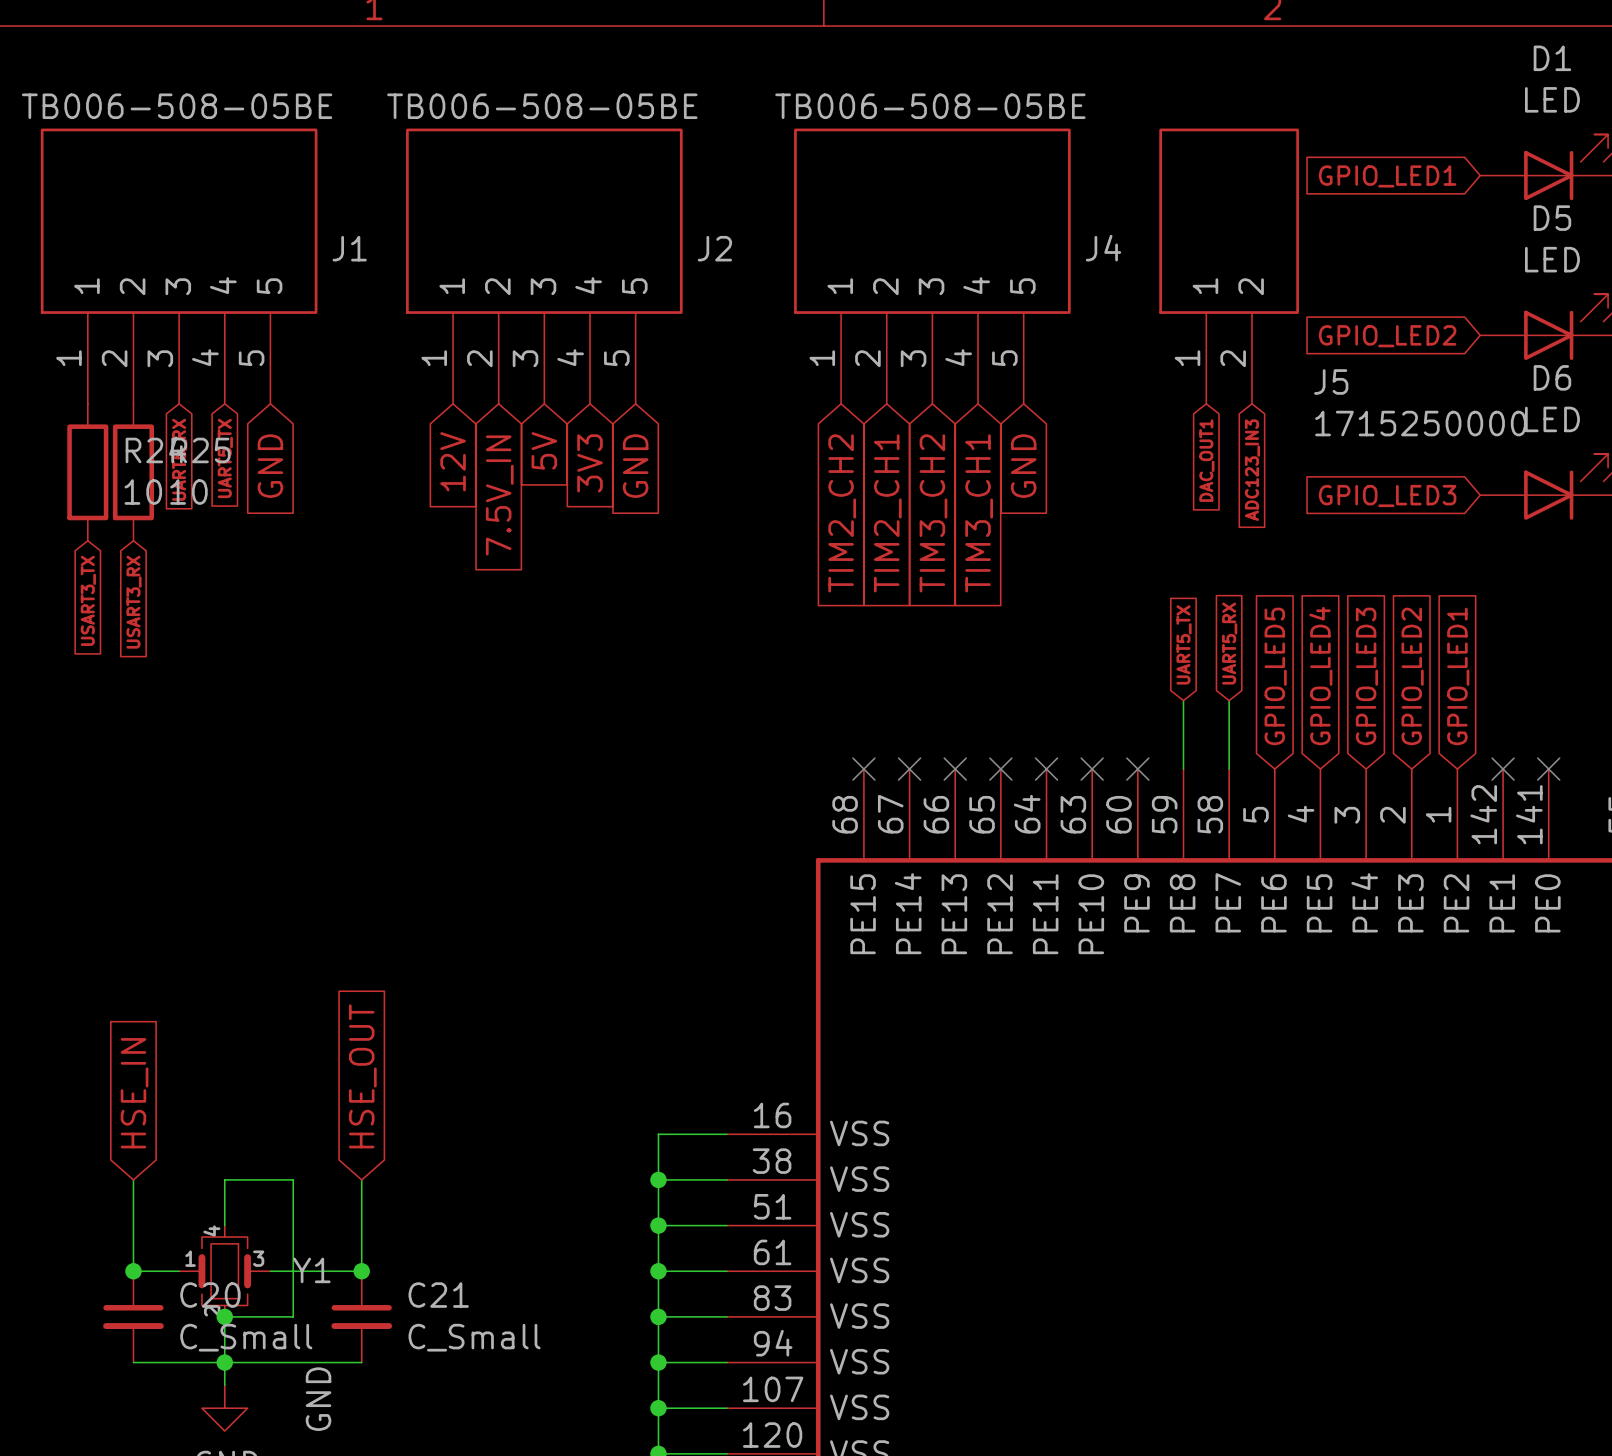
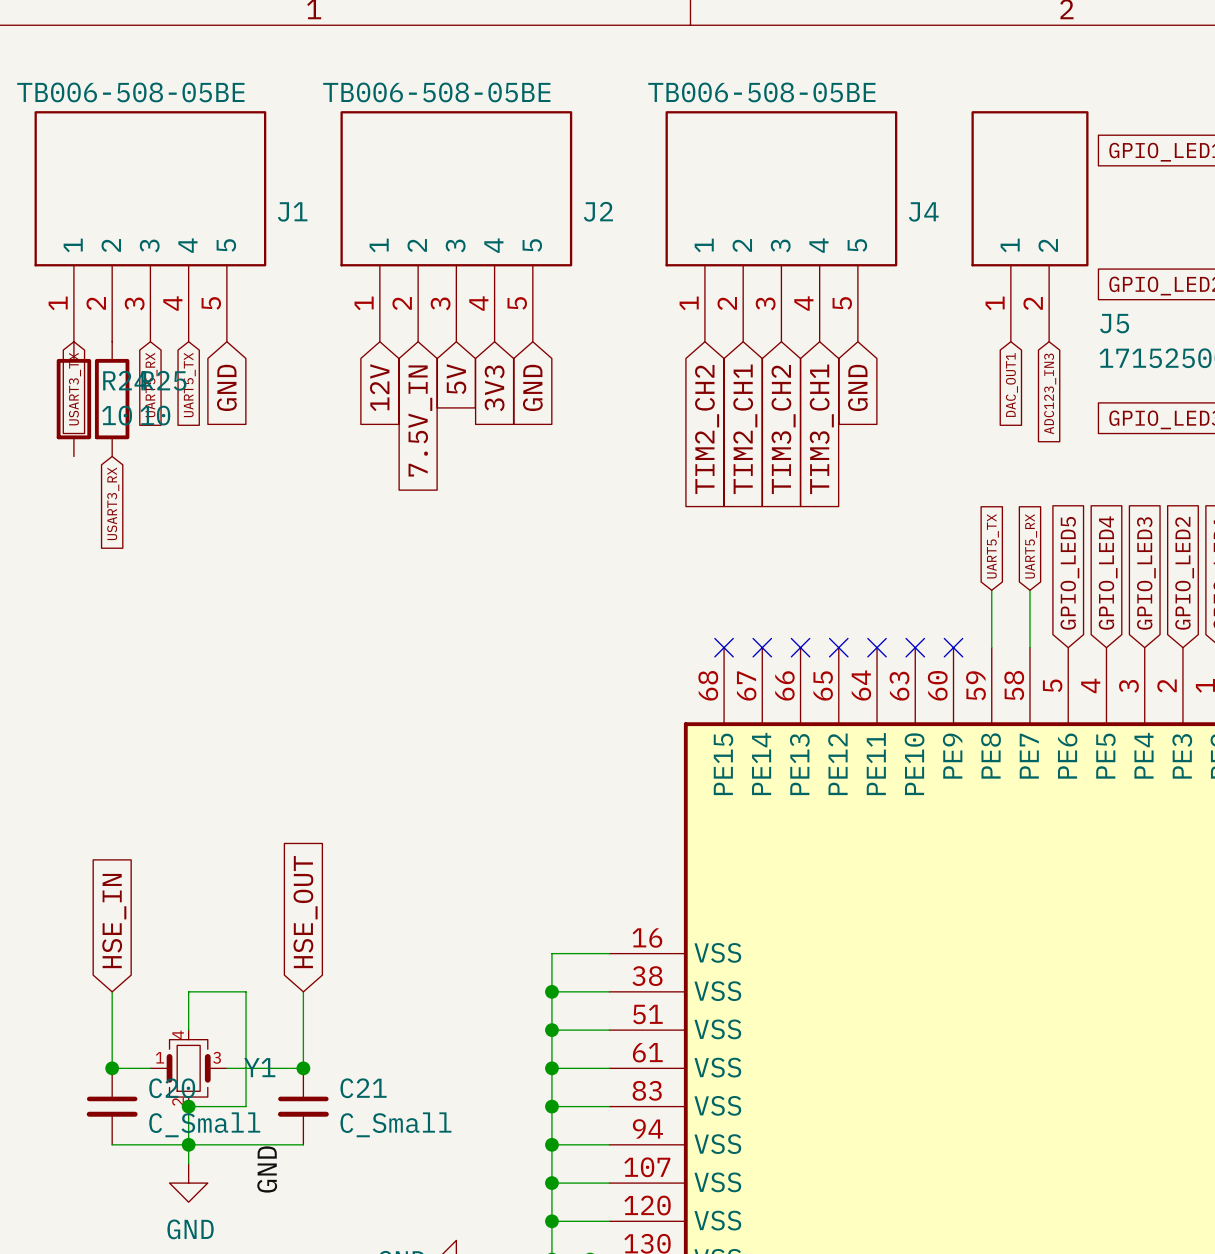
global label position: USART3_TX (88, 600) -> USART3_TX (75, 389)

